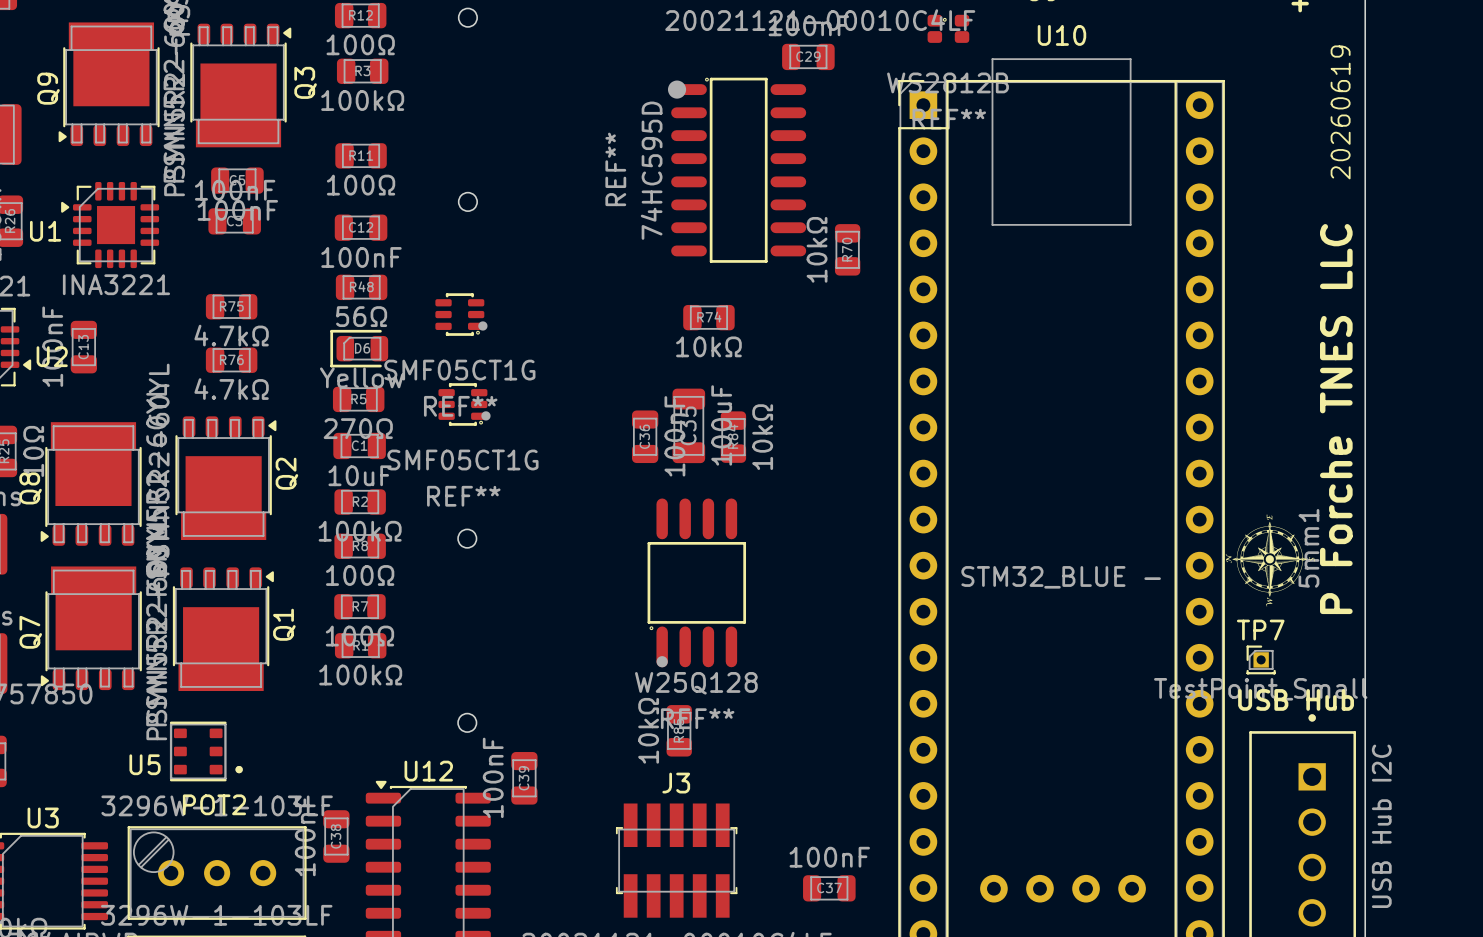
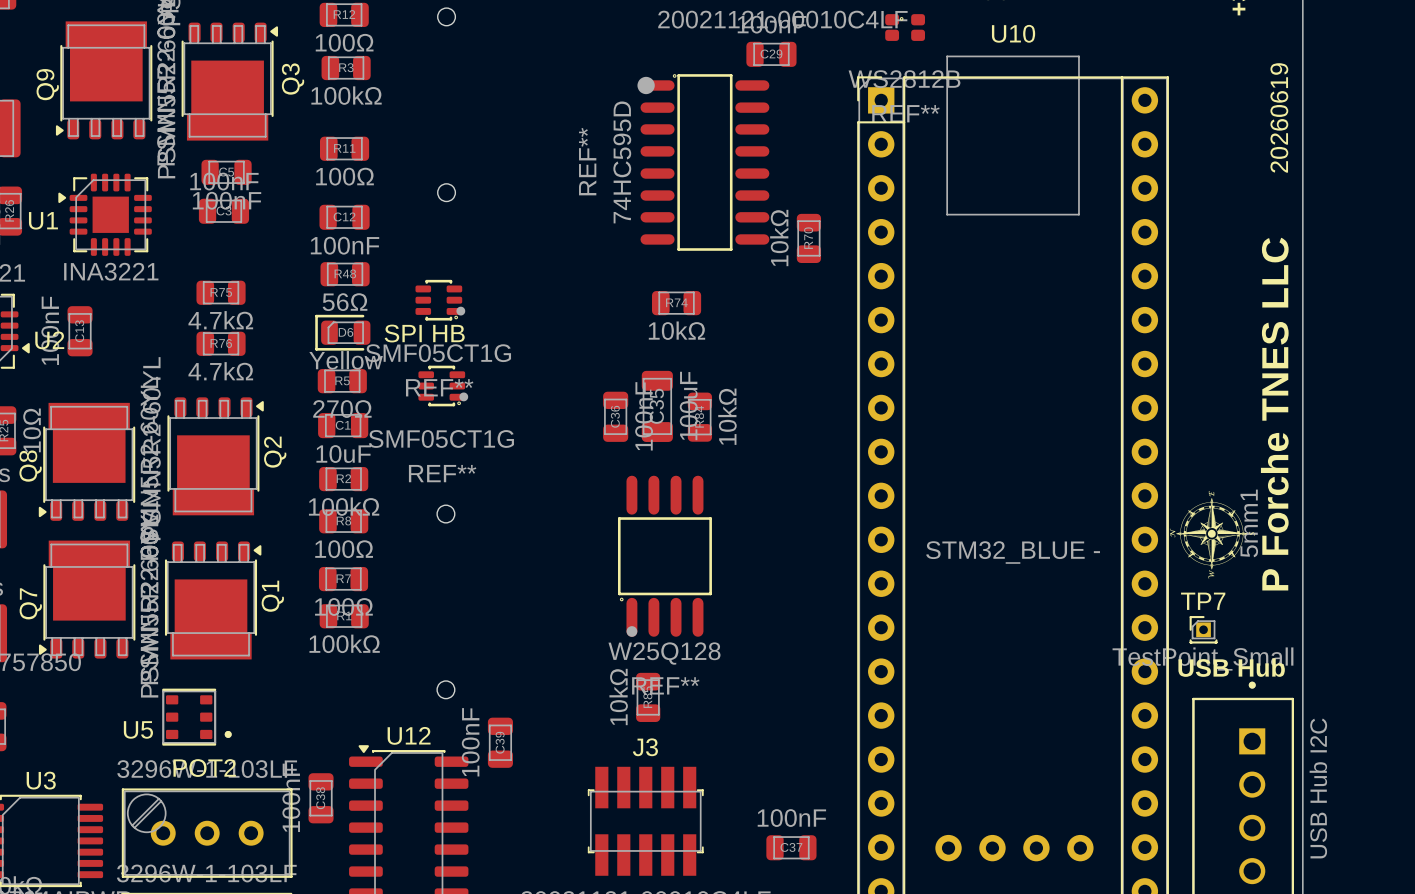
text: none -> SPI HB (424, 333)

